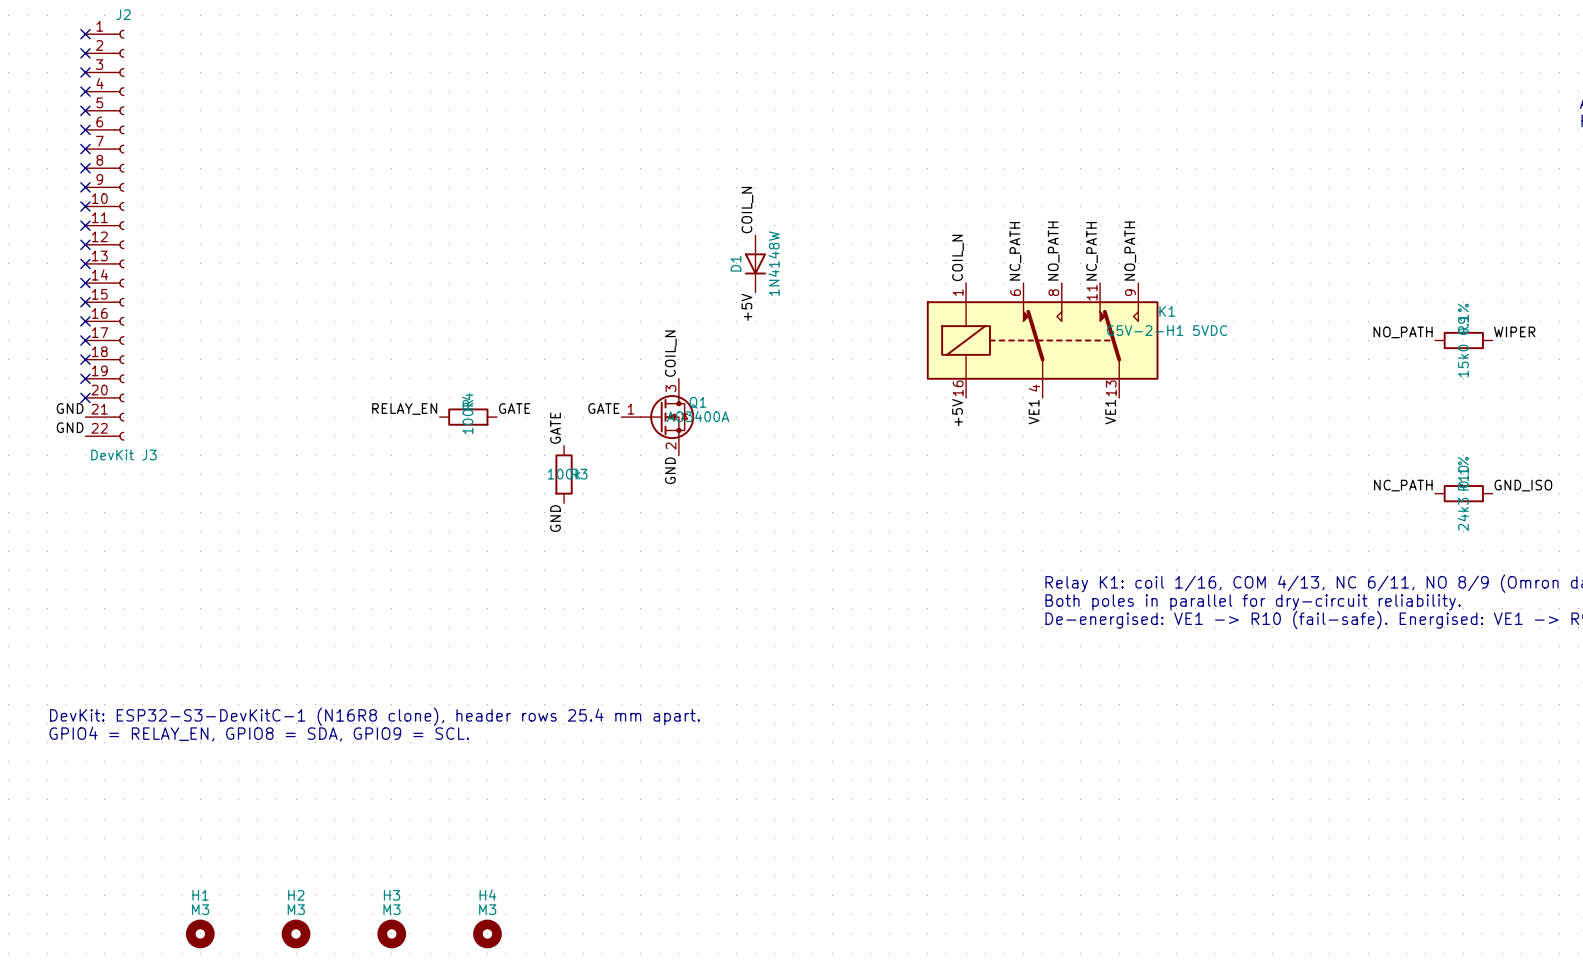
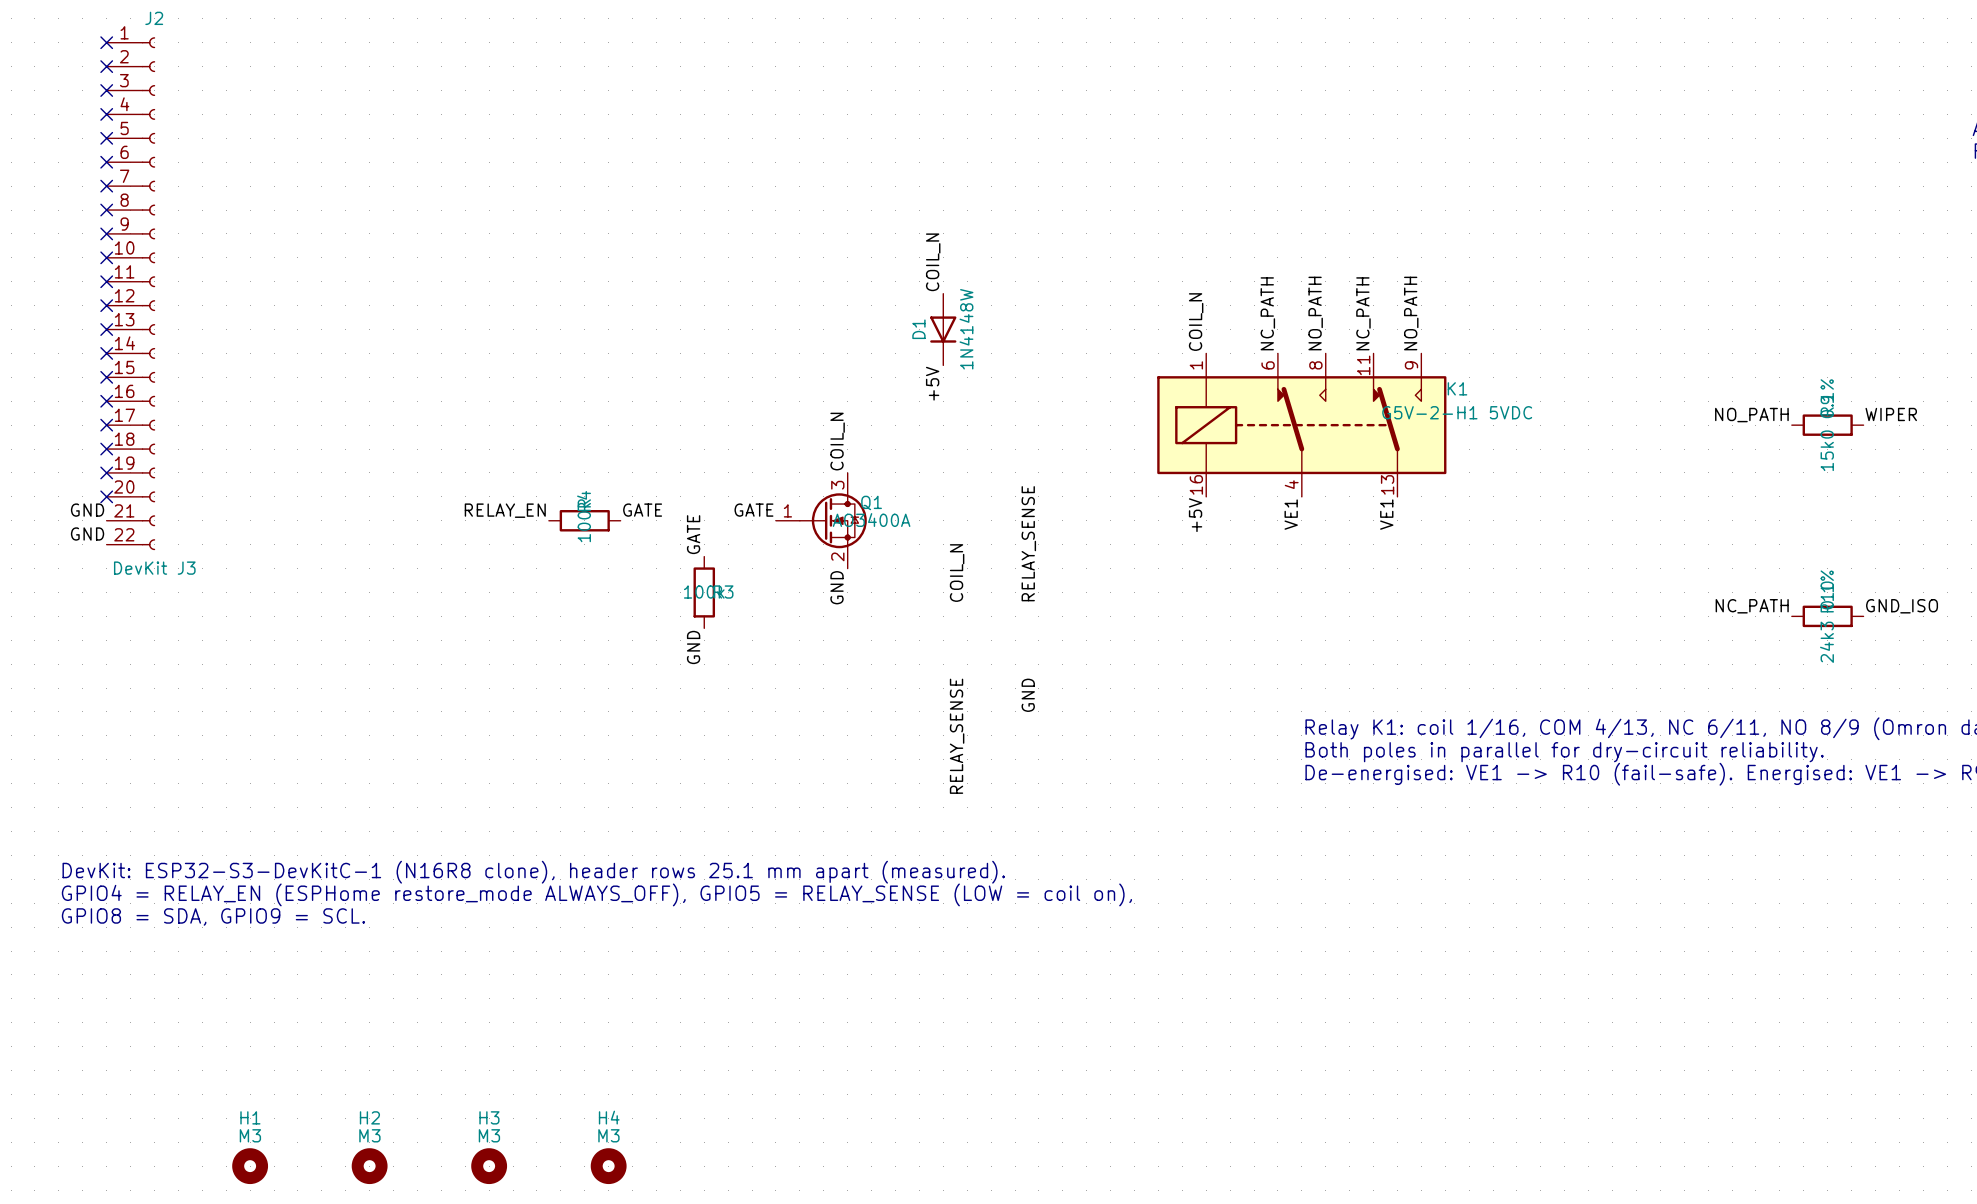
label: none -> RELAY_SENSE (1028, 543)
label: none -> COIL_N (957, 573)
label: none -> GND (1028, 695)
label: none -> RELAY_SENSE (957, 736)
text: none -> DevKit: ESP32-S3-DevKitC-1 (N16R8 clone), header rows 25.1 mm apart (measured). (533, 872)
text: DevKit: ESP32-S3-DevKitC-1 (N16R8 clone), header rows 25.4 mm apart. (374, 716) -> GPIO4 = RELAY_EN (ESPHome restore_mode ALWAYS_OFF), GPIO5 = RELAY_SENSE (LOW = coil on), (596, 894)
text: GPIO4 = RELAY_EN, GPIO8 = SDA, GPIO9 = SCL. (259, 734) -> GPIO8 = SDA, GPIO9 = SCL. (213, 916)

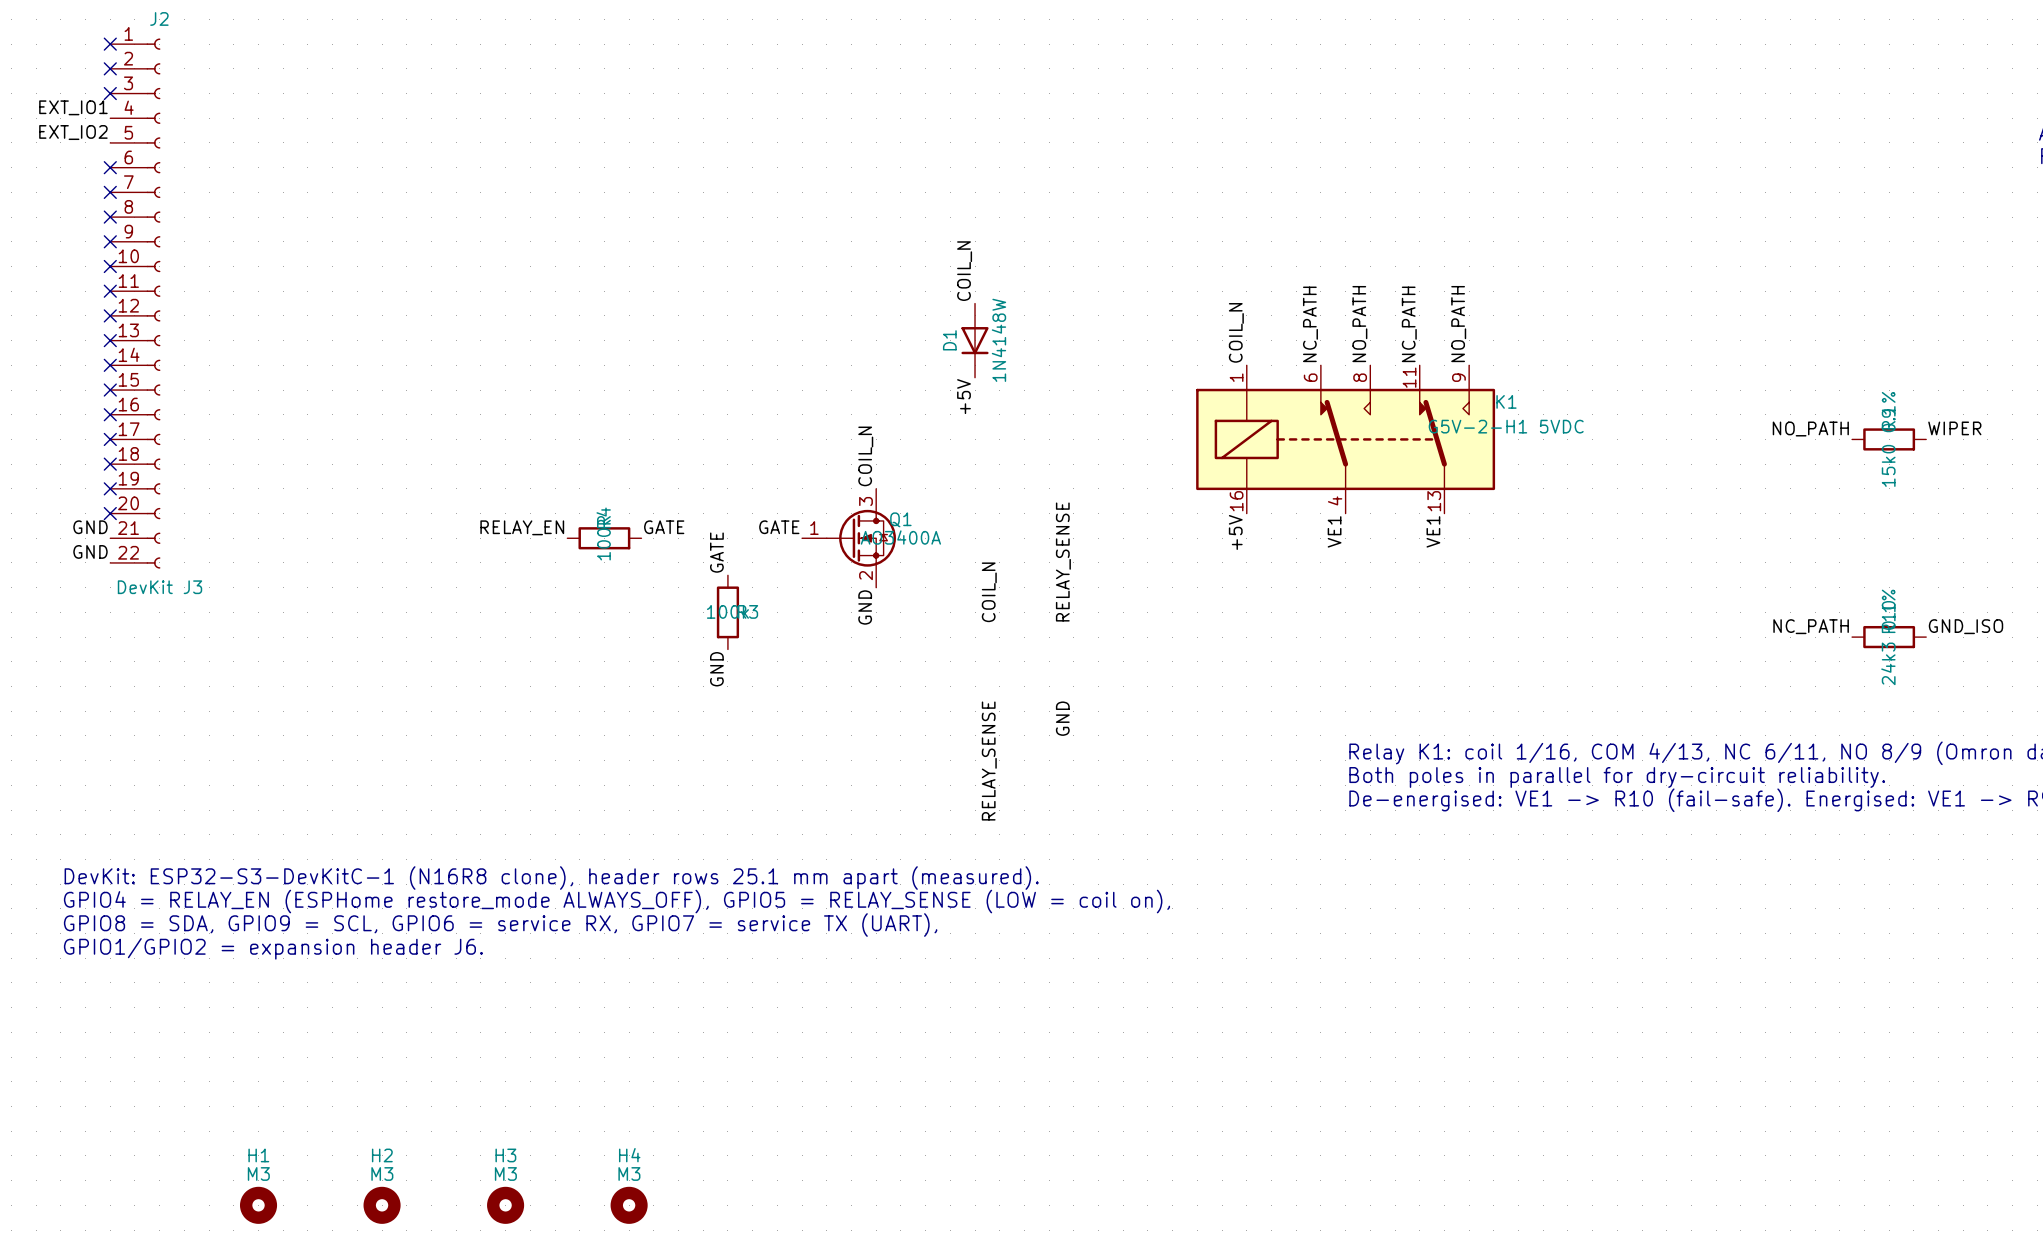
label: none -> EXT_IO1 (73, 107)
no-connect mark: (106, 114) -> none
label: none -> EXT_IO2 (73, 132)
no-connect mark: (106, 138) -> none
text: none -> DevKit: ESP32-S3-DevKitC-1 (N16R8 clone), header rows 25.1 mm apart (measured). (551, 878)
text: DevKit: ESP32-S3-DevKitC-1 (N16R8 clone), header rows 25.1 mm apart (measured). (533, 872) -> GPIO4 = RELAY_EN (ESPHome restore_mode ALWAYS_OFF), GPIO5 = RELAY_SENSE (LOW = coil on), (616, 901)
text: GPIO4 = RELAY_EN (ESPHome restore_mode ALWAYS_OFF), GPIO5 = RELAY_SENSE (LOW = coil on), (596, 894) -> GPIO8 = SDA, GPIO9 = SCL, GPIO6 = service RX, GPIO7 = service TX (UART), (500, 925)
text: GPIO8 = SDA, GPIO9 = SCL. (213, 916) -> GPIO1/GPIO2 = expansion header J6. (273, 948)

